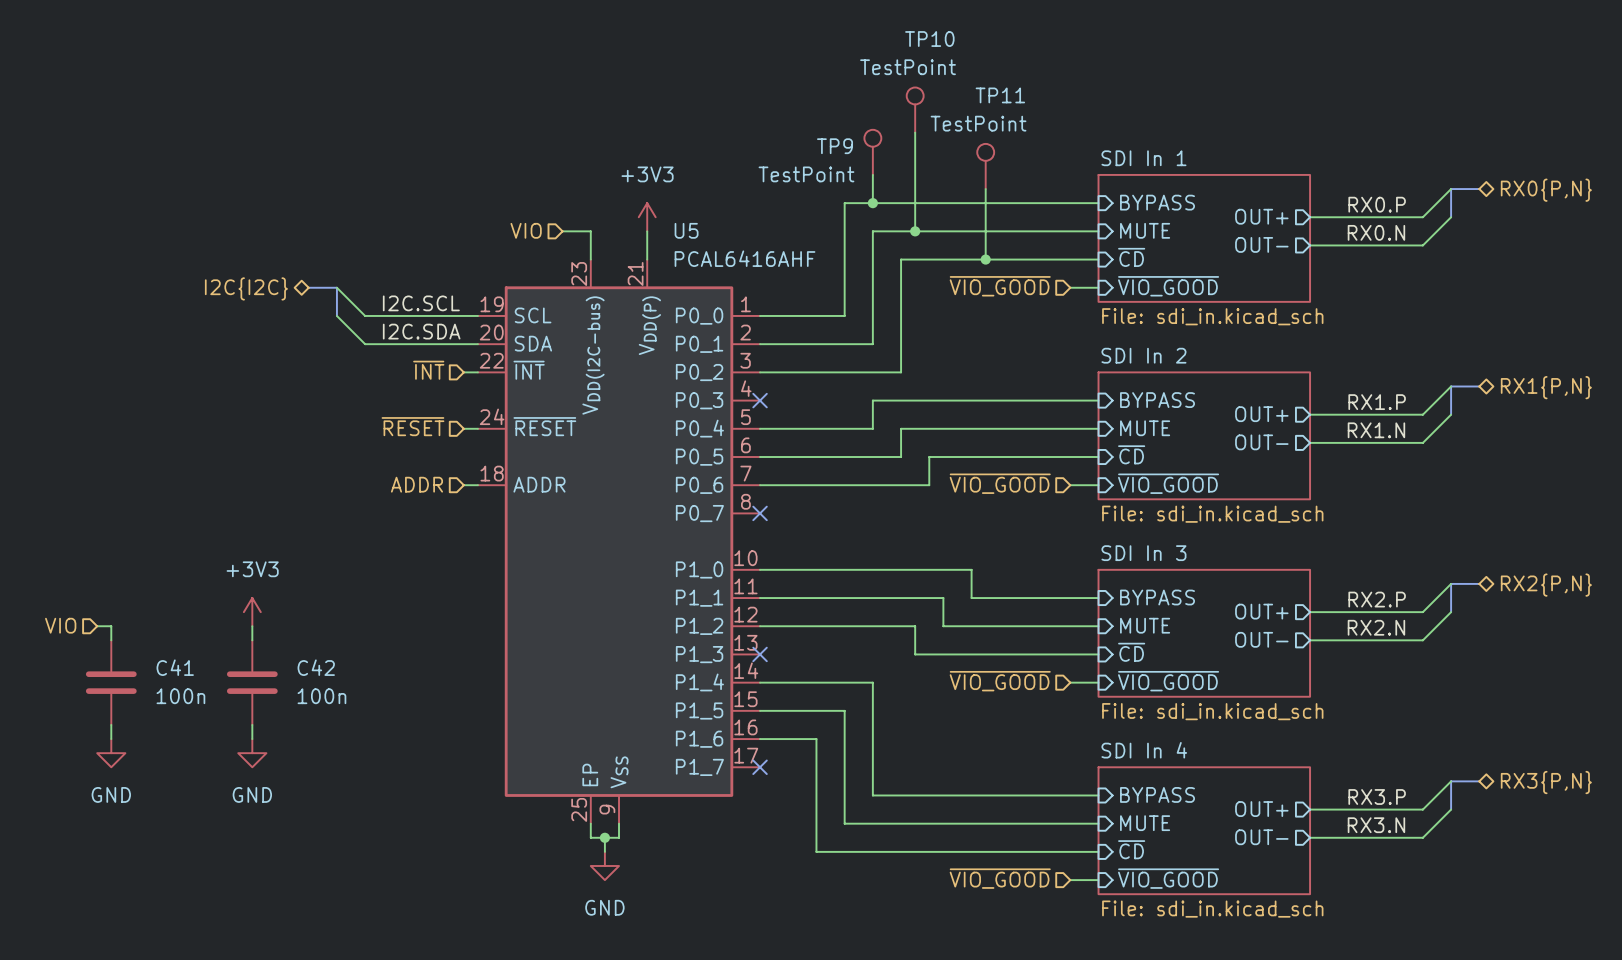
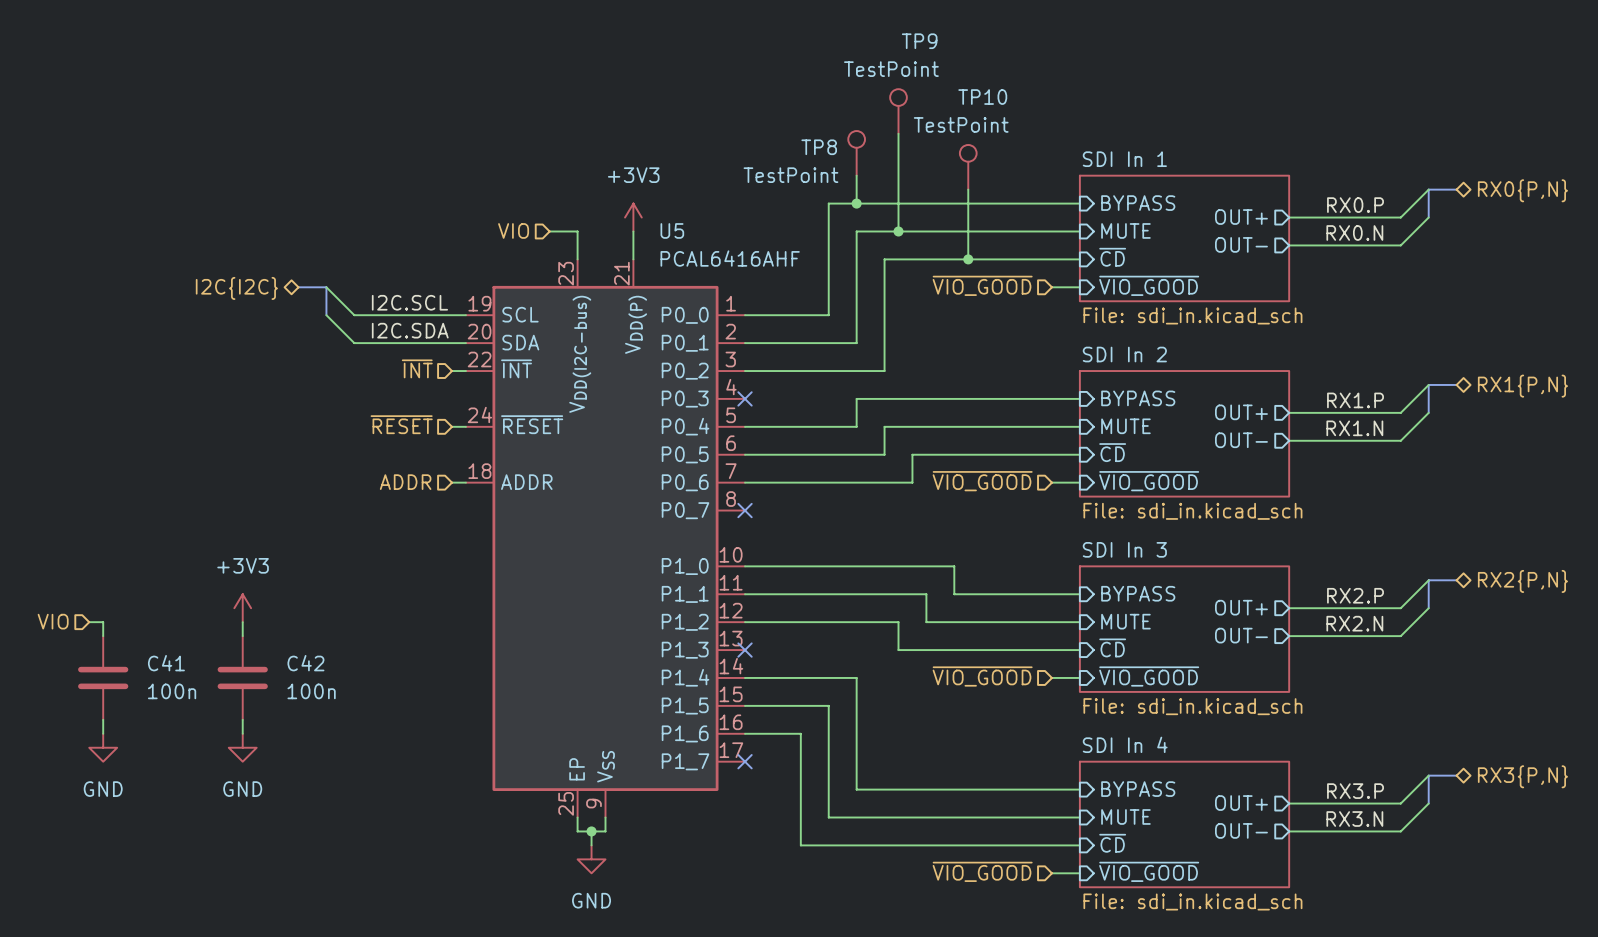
TP10 name: TP10 (929, 39) -> TP9 (919, 41)
TP11 name: TP11 (1000, 95) -> TP10 (982, 97)
TP9 name: TP9 (835, 146) -> TP8 (819, 147)

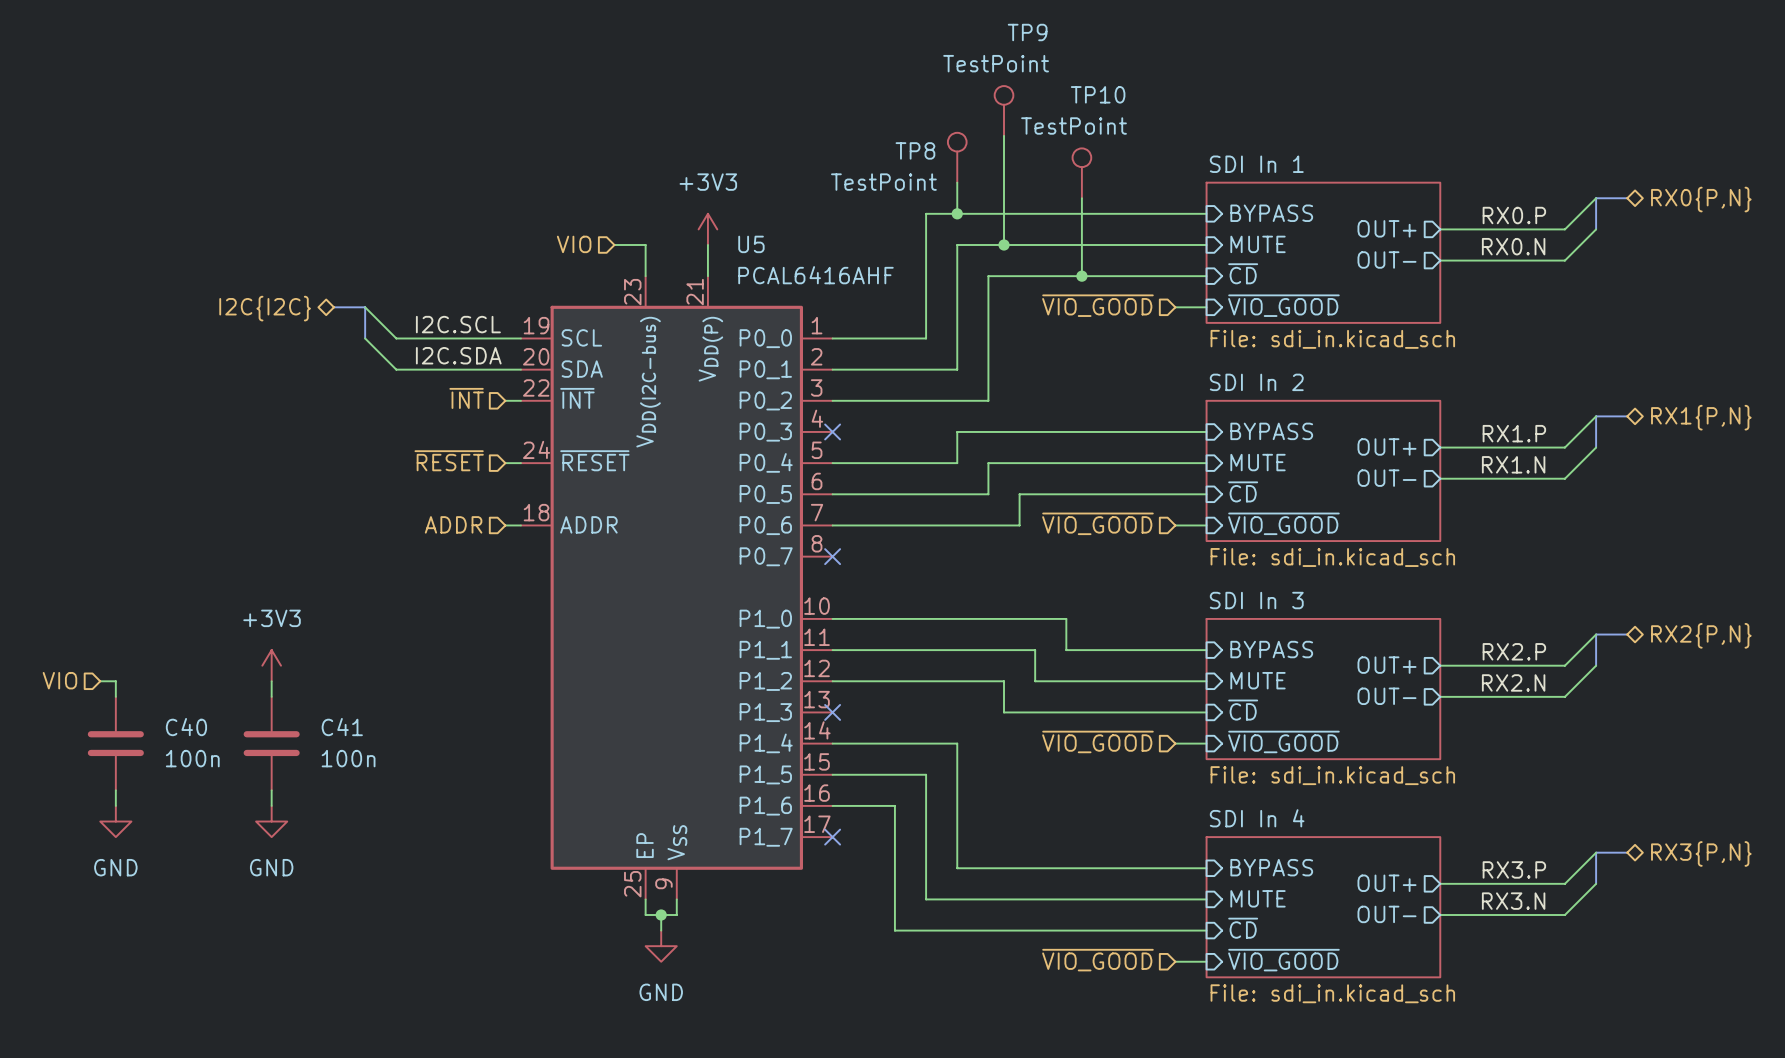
C41 name: C41 (166, 663) -> C40 (186, 727)
C42 name: C42 (305, 663) -> C41 (342, 727)

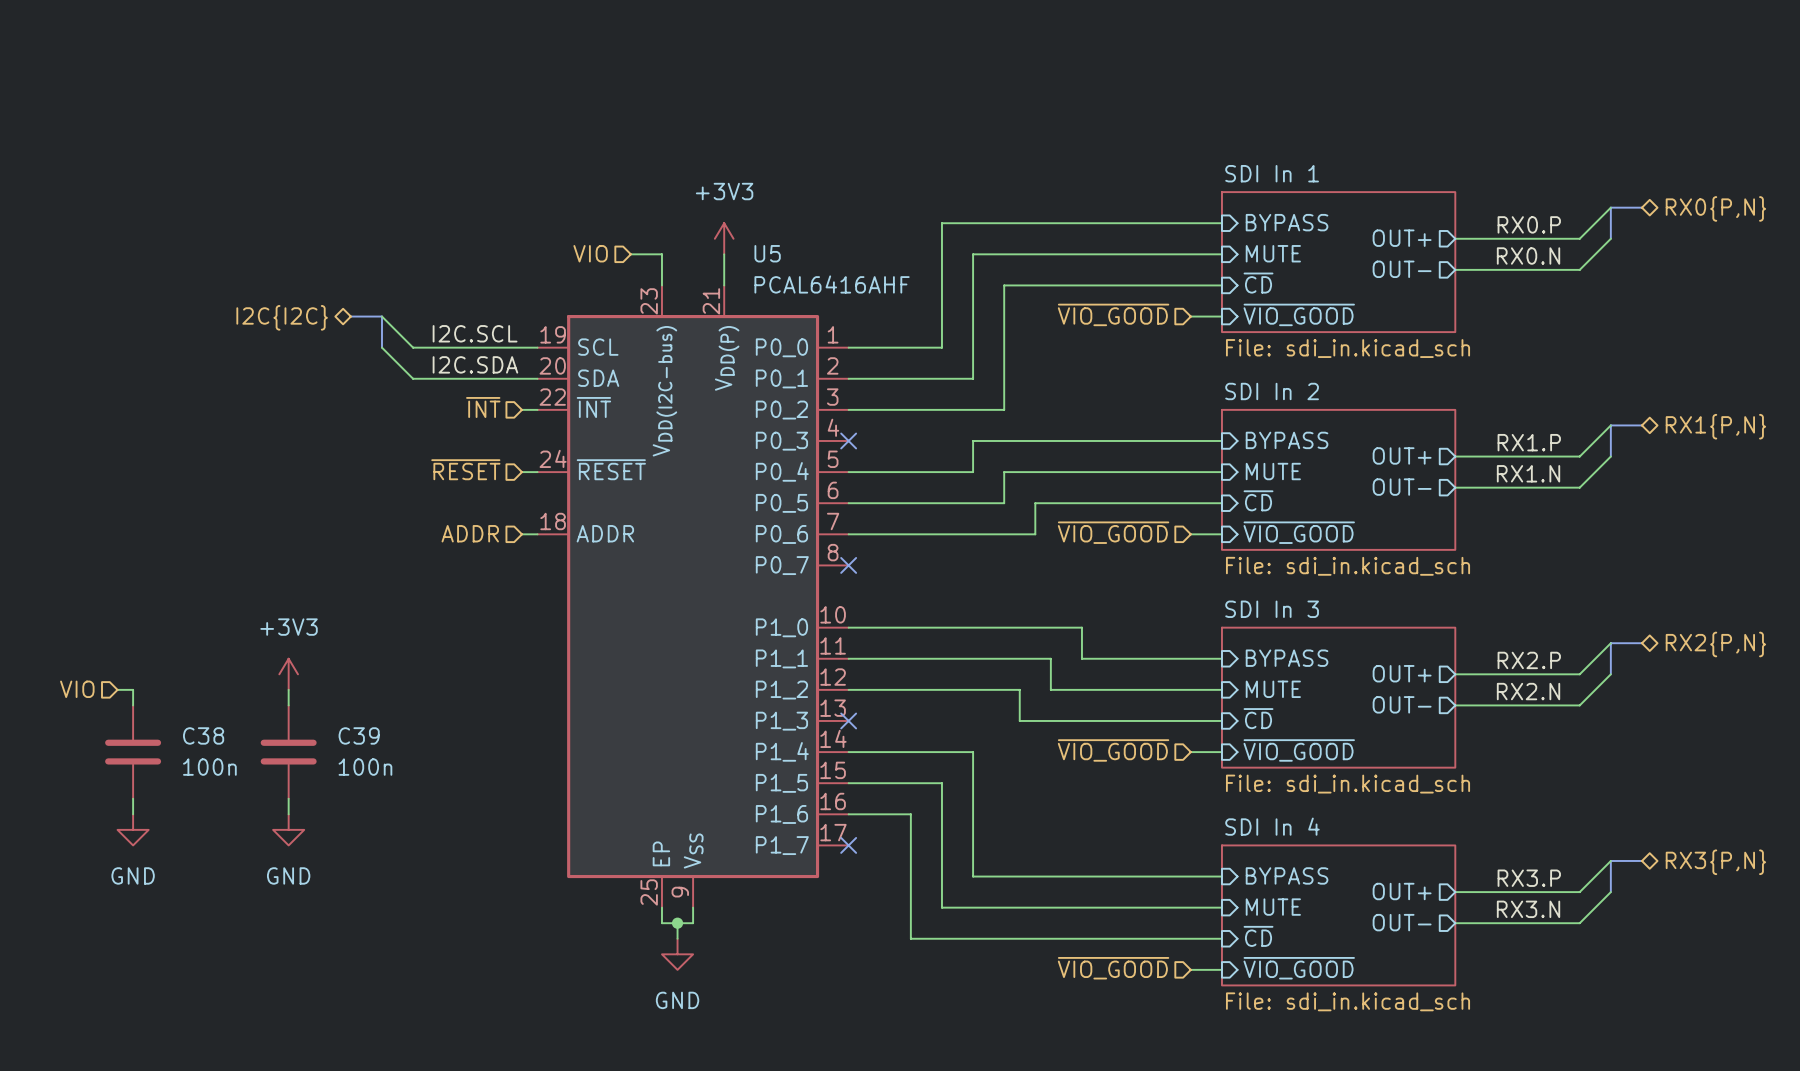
TP9: TestPoint (1004, 110) -> none
wire: (1004, 135) (1004, 244) -> none
TP8: TestPoint (957, 157) -> none
TP10: TestPoint (1081, 173) -> none
wire: (957, 182) (957, 213) -> none
wire: (1081, 198) (1081, 276) -> none
junction: (957, 213) -> none
junction: (1004, 244) -> none
junction: (1081, 276) -> none
C40 name: C40 (186, 727) -> C38 (203, 735)
C41 name: C41 (342, 727) -> C39 (359, 735)

